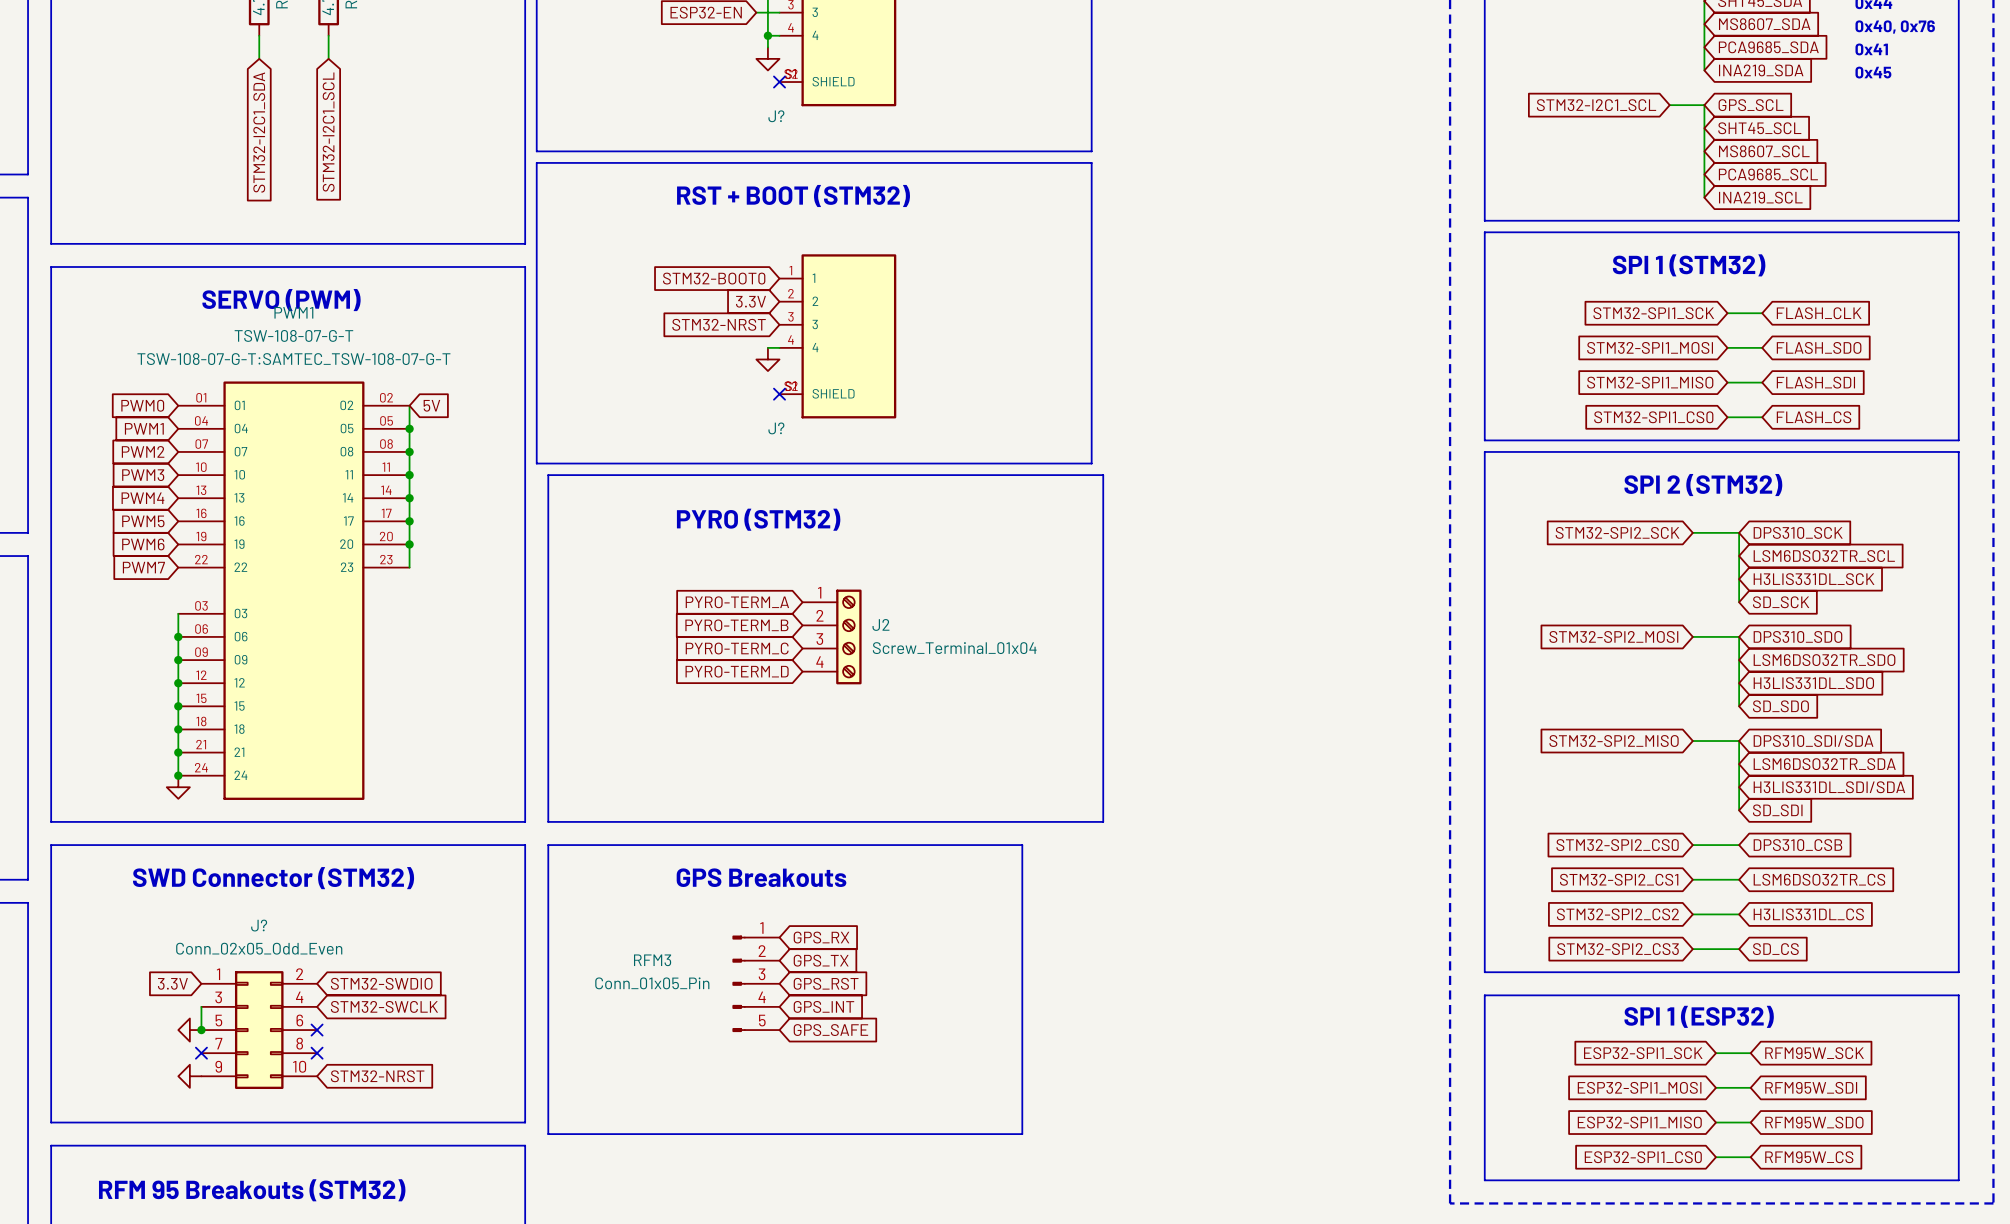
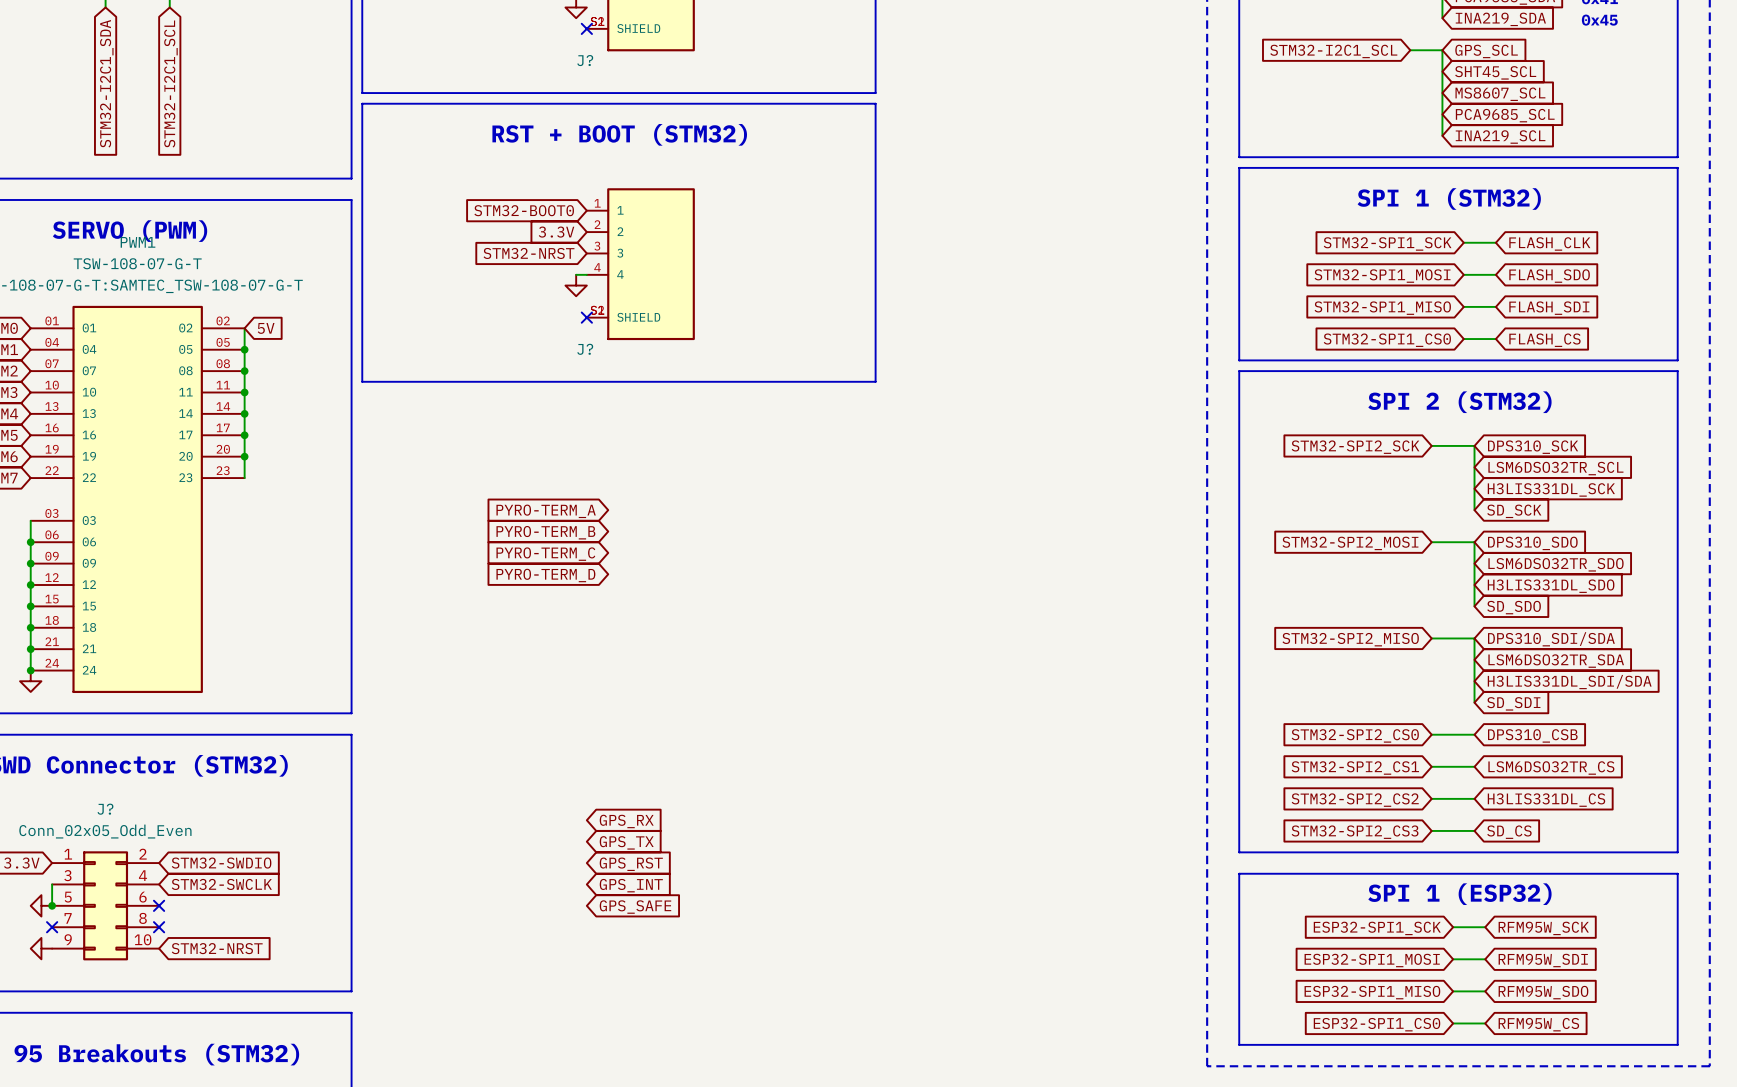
line: (548, 475) (548, 821) (1103, 821) (1103, 475) (548, 475) -> none
text: PYRO (STM32) (758, 519) -> none
J2: Screw_Terminal_01x04 (832, 636) -> none
line: (548, 845) (1022, 845) (1022, 1134) (548, 1134) (548, 845) -> none
text: GPS Breakouts (761, 877) -> none
RFM3: Conn_01x05_Pin (756, 983) -> none

